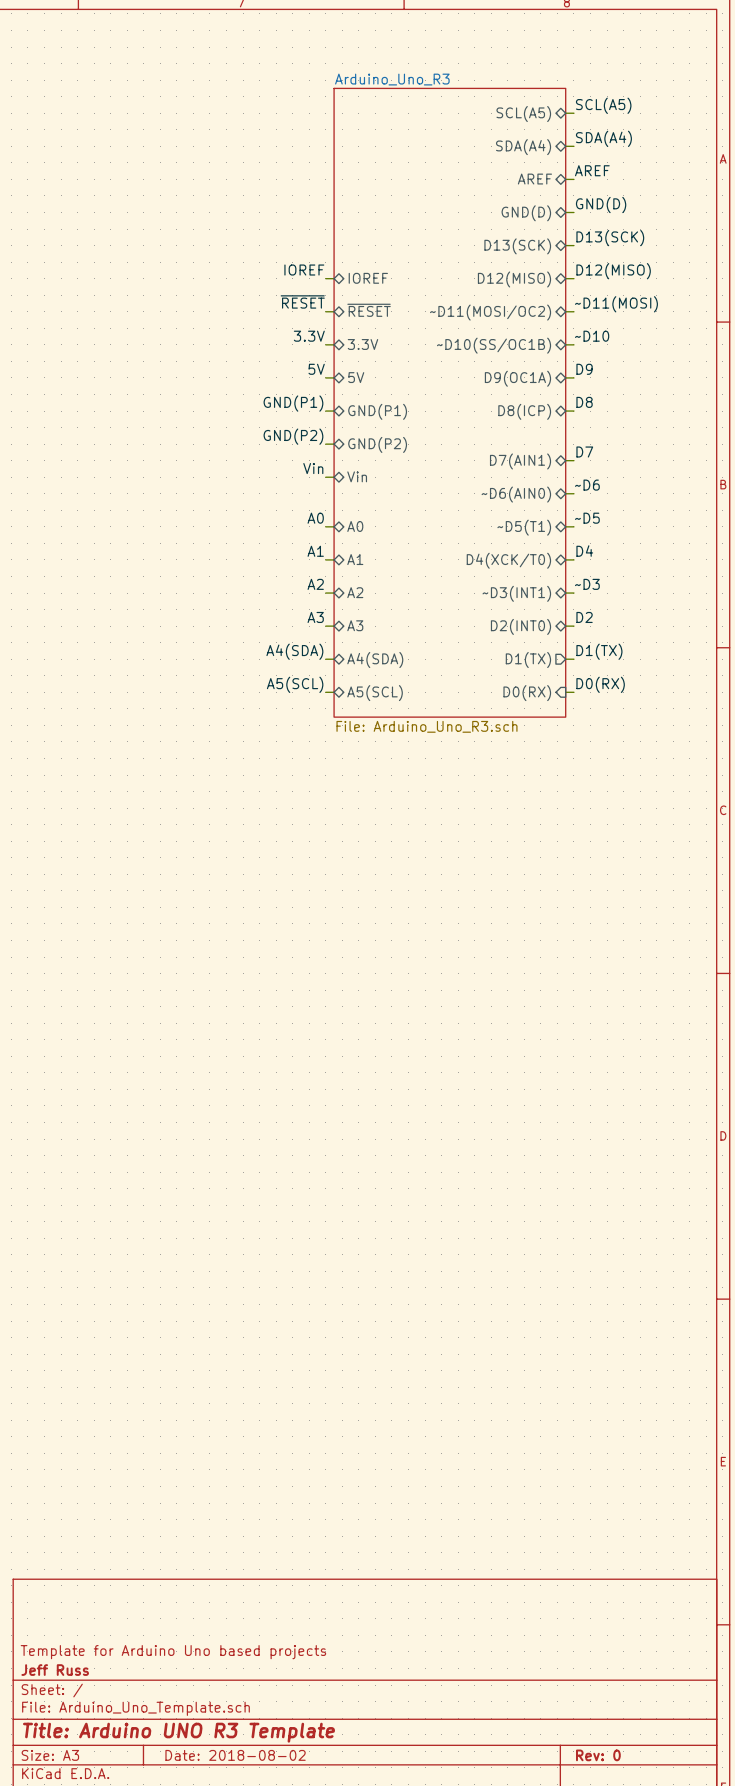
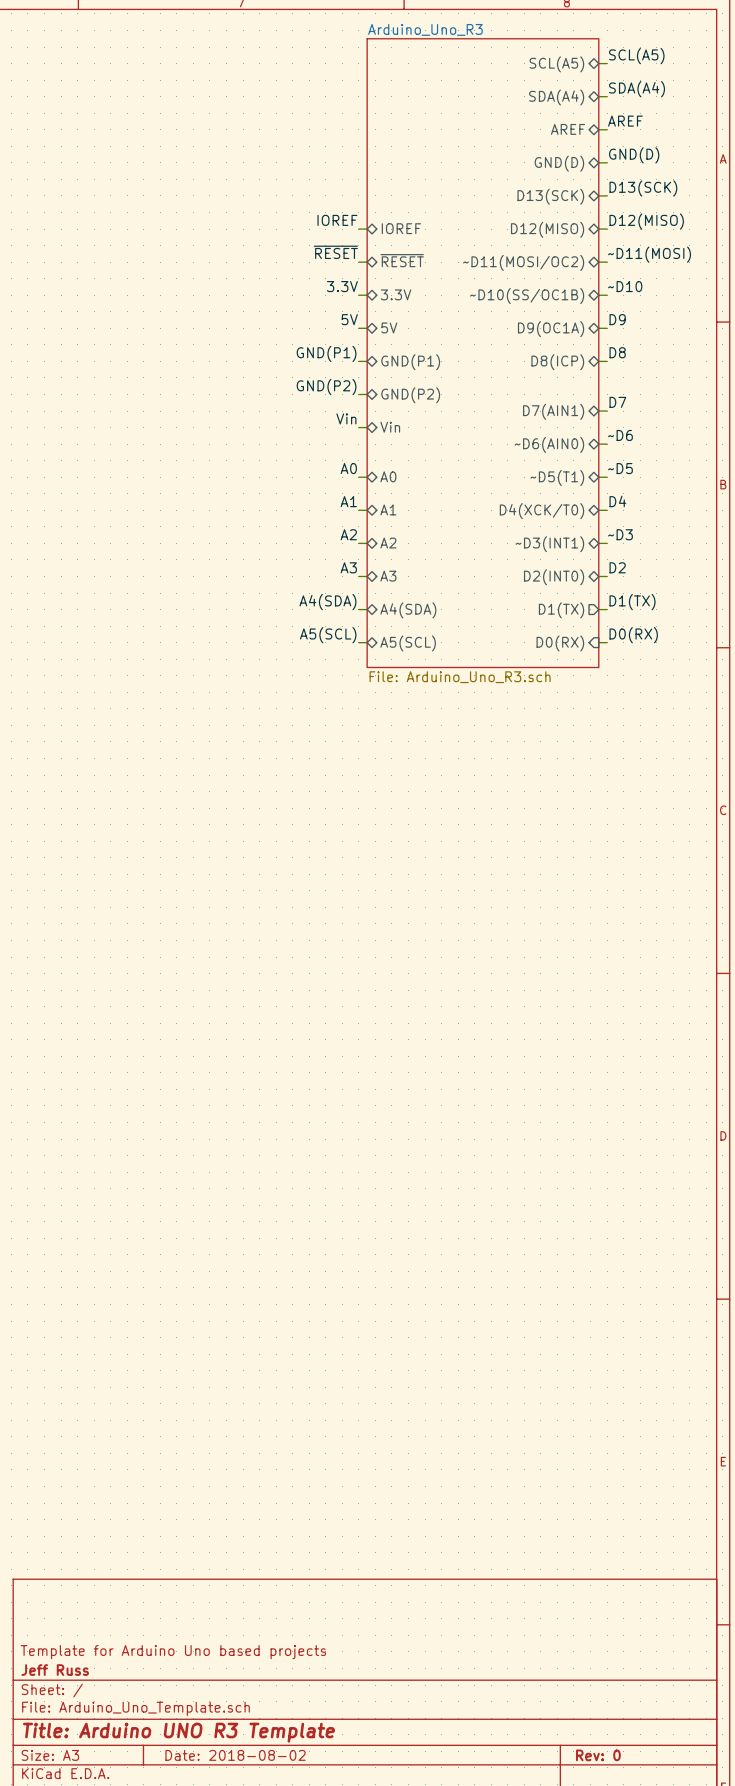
label position: SCL(A5) (603, 105) -> SCL(A5) (636, 56)
wire: (565, 113) (573, 113) -> (598, 63) (607, 63)
sheet pin position: SCL(A5) (523, 114) -> SCL(A5) (556, 64)
label position: SDA(A4) (603, 138) -> SDA(A4) (637, 89)
wire: (565, 146) (573, 146) -> (598, 96) (607, 96)
sheet pin position: SDA(A4) (523, 147) -> SDA(A4) (556, 97)
label position: AREF (592, 170) -> AREF (625, 121)
sheet pin position: AREF (534, 179) -> AREF (568, 129)
wire: (565, 179) (573, 179) -> (598, 129) (607, 129)
label position: GND(D) (601, 205) -> GND(D) (634, 155)
wire: (565, 212) (573, 212) -> (598, 162) (607, 162)
sheet pin position: GND(D) (526, 213) -> GND(D) (559, 163)
label position: D13(SCK) (610, 238) -> D13(SCK) (643, 188)
wire: (565, 245) (573, 245) -> (598, 195) (607, 195)
sheet pin position: D13(SCK) (517, 246) -> D13(SCK) (550, 196)
label position: IOREF (304, 270) -> IOREF (337, 220)
label position: D12(MISO) (613, 271) -> D12(MISO) (646, 221)
wire: (325, 278) (334, 278) -> (358, 229) (367, 229)
sheet pin position: IOREF (368, 278) -> IOREF (401, 228)
wire: (565, 278) (573, 278) -> (598, 229) (607, 229)
sheet pin position: D12(MISO) (514, 279) -> D12(MISO) (547, 229)
label position: ~{RESET} (302, 301) -> ~{RESET} (335, 252)
label position: ~D11(MOSI) (616, 304) -> ~D11(MOSI) (649, 254)
sheet pin position: ~{RESET} (369, 310) -> ~{RESET} (402, 260)
wire: (325, 311) (334, 311) -> (358, 262) (367, 262)
wire: (565, 311) (573, 311) -> (598, 262) (607, 262)
sheet pin position: ~D11(MOSI/OC2) (490, 312) -> ~D11(MOSI/OC2) (523, 262)
label position: 3.3V (309, 336) -> 3.3V (342, 286)
label position: ~D10 (592, 336) -> ~D10 (625, 286)
wire: (325, 344) (334, 344) -> (358, 295) (367, 295)
sheet pin position: 3.3V (362, 344) -> 3.3V (396, 294)
wire: (565, 344) (573, 344) -> (598, 295) (607, 295)
sheet pin position: ~D10(SS/OC1B) (494, 345) -> ~D10(SS/OC1B) (527, 296)
label position: 5V (316, 369) -> 5V (349, 319)
label position: D9 (584, 369) -> D9 (617, 319)
wire: (325, 377) (334, 377) -> (358, 328) (367, 328)
sheet pin position: 5V (356, 377) -> 5V (389, 327)
wire: (565, 377) (573, 377) -> (598, 328) (607, 328)
sheet pin position: D9(OC1A) (517, 378) -> D9(OC1A) (551, 329)
sheet Arduino_Uno_R3 position: (449, 402) -> (482, 353)
label position: D8 (584, 402) -> D8 (617, 352)
label position: GND(P1) (293, 403) -> GND(P1) (326, 353)
wire: (325, 411) (334, 411) -> (358, 361) (367, 361)
sheet pin position: GND(P1) (377, 411) -> GND(P1) (410, 362)
sheet pin position: D8(ICP) (524, 411) -> D8(ICP) (557, 362)
wire: (565, 411) (573, 411) -> (598, 361) (607, 361)
label position: GND(P2) (293, 436) -> GND(P2) (326, 387)
wire: (325, 444) (334, 444) -> (358, 394) (367, 394)
sheet pin position: GND(P2) (377, 444) -> GND(P2) (410, 395)
label position: D7 (584, 452) -> D7 (617, 402)
wire: (565, 460) (573, 460) -> (598, 411) (607, 411)
sheet pin position: D7(AIN1) (520, 461) -> D7(AIN1) (553, 411)
label position: Vin (313, 468) -> Vin (346, 418)
sheet pin position: Vin (357, 476) -> Vin (390, 427)
wire: (325, 477) (334, 477) -> (358, 427) (367, 427)
label position: ~D6 (587, 485) -> ~D6 (620, 435)
wire: (565, 493) (573, 493) -> (598, 444) (607, 444)
sheet pin position: ~D6(AIN0) (516, 494) -> ~D6(AIN0) (549, 444)
label position: A0 (315, 518) -> A0 (348, 468)
label position: ~D5 (587, 518) -> ~D5 (620, 468)
wire: (325, 526) (334, 526) -> (358, 477) (367, 477)
sheet pin position: A0 (355, 526) -> A0 (388, 476)
wire: (565, 526) (573, 526) -> (598, 477) (607, 477)
sheet pin position: ~D5(T1) (524, 527) -> ~D5(T1) (557, 478)
label position: A1 (315, 551) -> A1 (348, 501)
label position: D4 (584, 551) -> D4 (617, 501)
wire: (325, 559) (334, 559) -> (358, 510) (367, 510)
sheet pin position: A1 (355, 559) -> A1 (388, 509)
wire: (565, 559) (573, 559) -> (598, 510) (607, 510)
sheet pin position: D4(XCK/T0) (508, 560) -> D4(XCK/T0) (541, 511)
label position: A2 (315, 584) -> A2 (348, 534)
label position: ~D3 (587, 584) -> ~D3 (620, 534)
sheet pin position: A2 (355, 592) -> A2 (388, 543)
wire: (325, 593) (334, 593) -> (358, 543) (367, 543)
sheet pin position: ~D3(INT1) (516, 593) -> ~D3(INT1) (549, 544)
wire: (565, 593) (573, 593) -> (598, 543) (607, 543)
label position: A3 (315, 617) -> A3 (348, 567)
label position: D2 (584, 617) -> D2 (617, 567)
sheet pin position: A3 (355, 625) -> A3 (388, 576)
wire: (325, 626) (334, 626) -> (358, 576) (367, 576)
sheet pin position: D2(INT0) (520, 626) -> D2(INT0) (554, 577)
wire: (565, 626) (573, 626) -> (598, 576) (607, 576)
label position: A4(SDA) (294, 651) -> A4(SDA) (327, 602)
label position: D1(TX) (599, 651) -> D1(TX) (632, 602)
wire: (325, 659) (334, 659) -> (358, 609) (367, 609)
wire: (565, 659) (573, 659) -> (598, 609) (607, 609)
sheet pin position: A4(SDA) (375, 660) -> A4(SDA) (408, 610)
sheet pin position: D1(TX) (528, 660) -> D1(TX) (561, 610)
label position: A5(SCL) (295, 684) -> A5(SCL) (328, 635)
label position: D0(RX) (600, 684) -> D0(RX) (633, 635)
wire: (325, 692) (334, 692) -> (358, 642) (367, 642)
wire: (565, 692) (573, 692) -> (598, 642) (607, 642)
sheet pin position: A5(SCL) (375, 693) -> A5(SCL) (408, 643)
sheet pin position: D0(RX) (527, 693) -> D0(RX) (560, 643)

